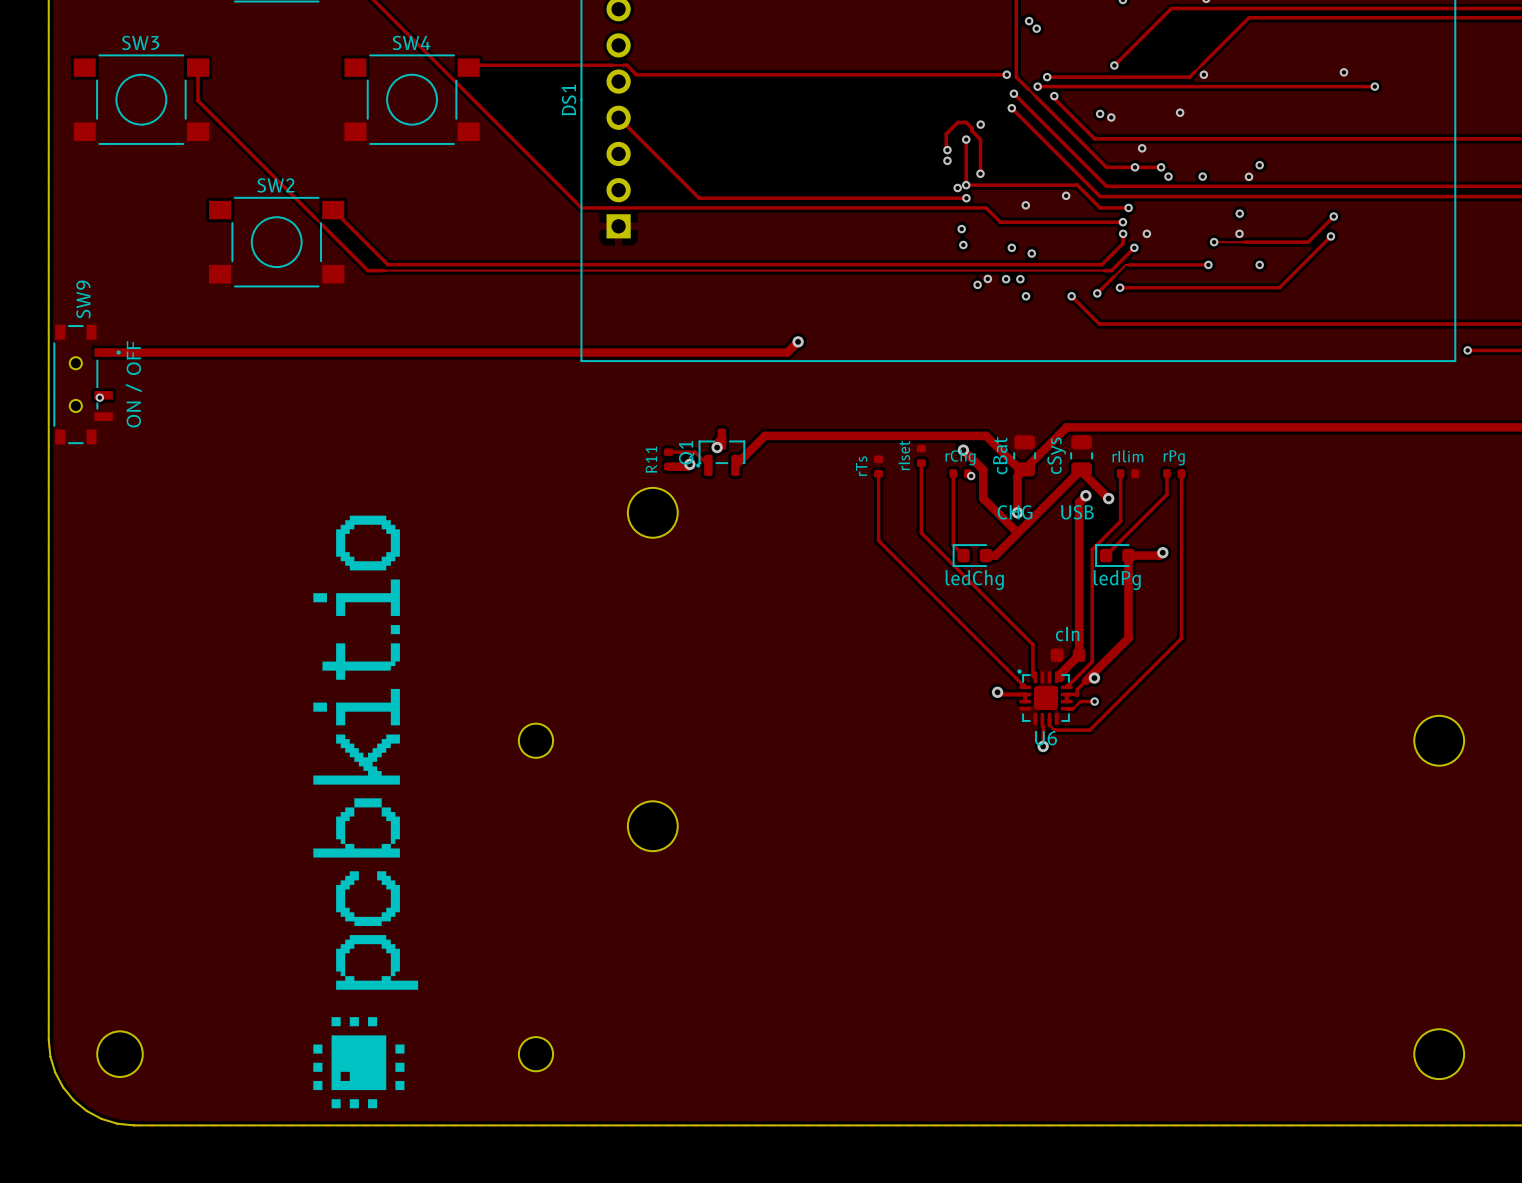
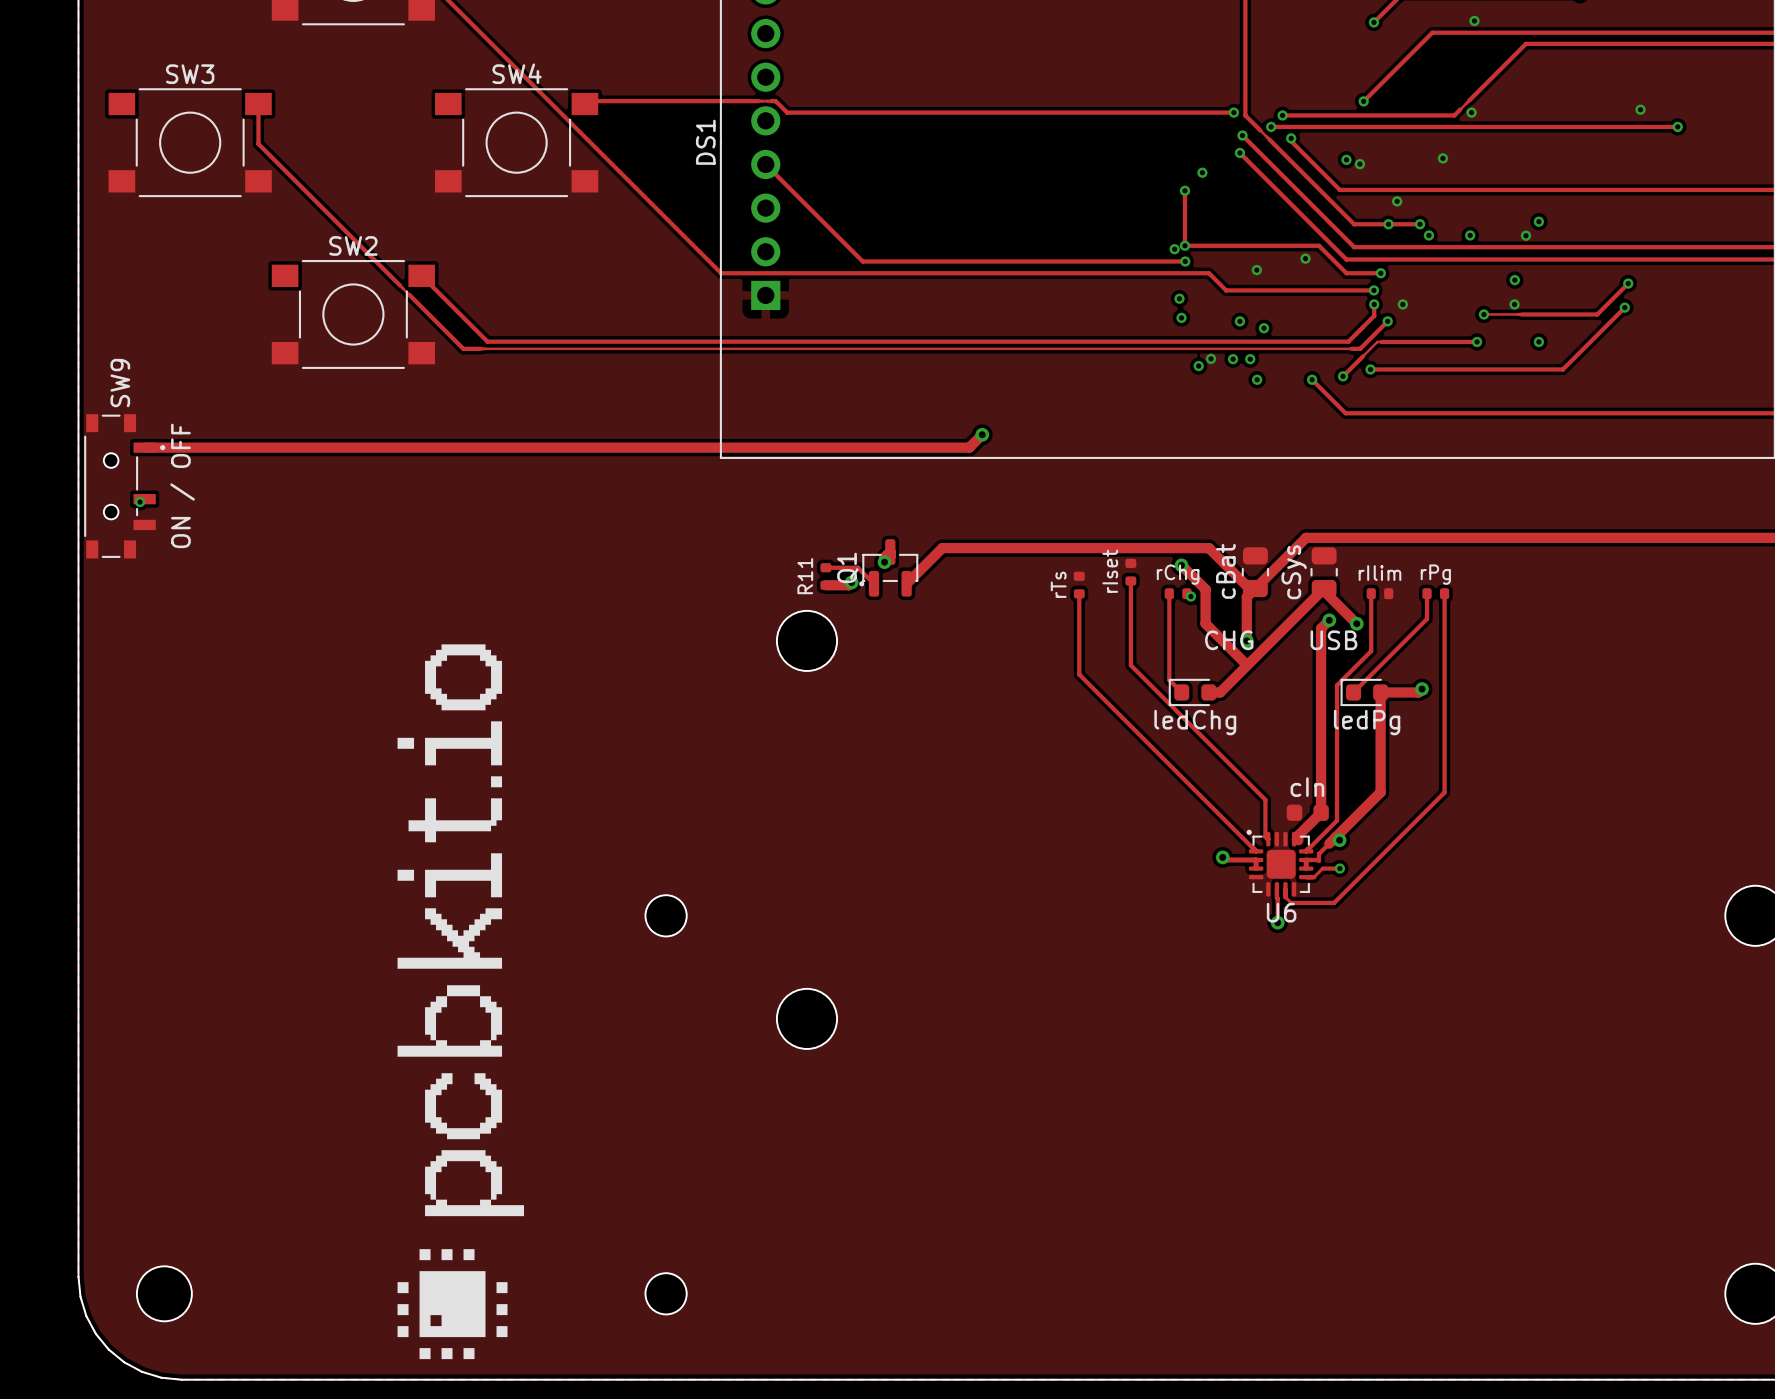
via: (1029, 21) -> none
via: (1036, 28) -> none
track: (946, 150) (946, 133) (957, 122) (966, 122) (980, 139) (980, 173) -> none
via: (947, 150) -> none
via: (947, 160) -> none
via: (980, 173) -> none

